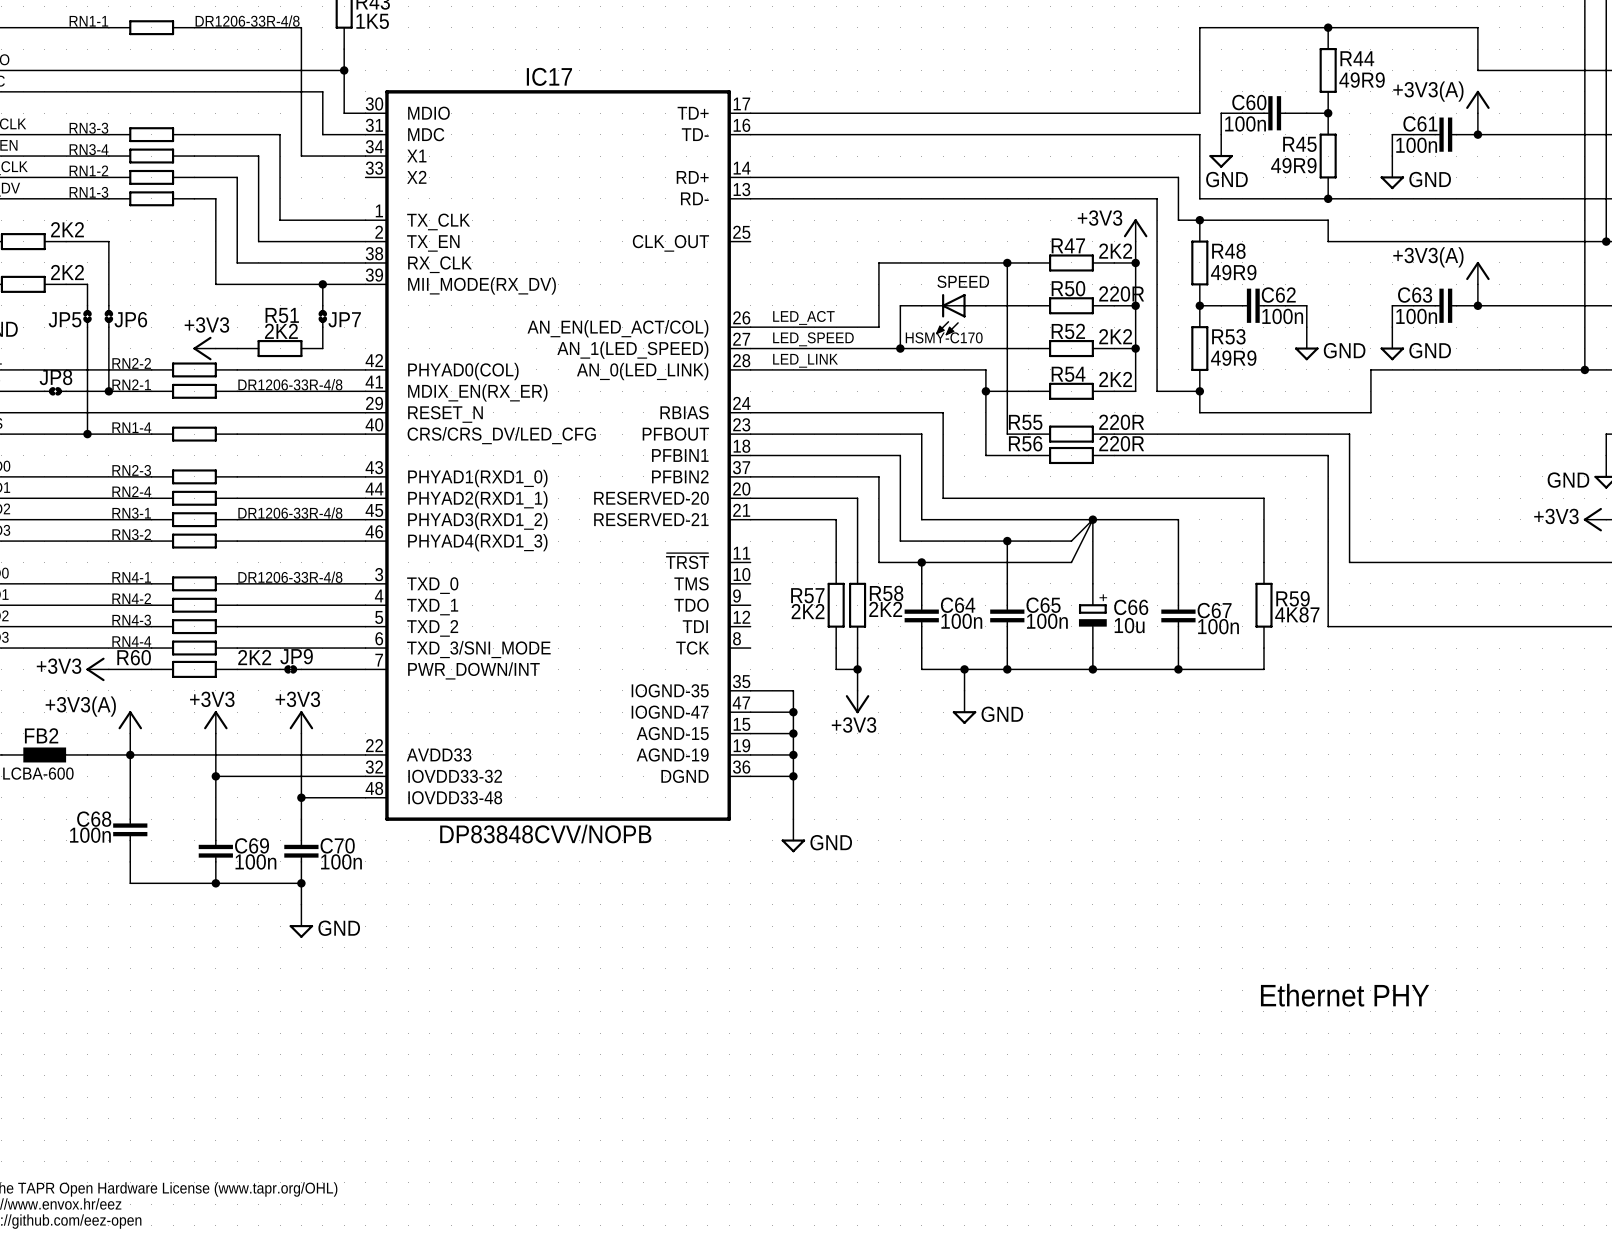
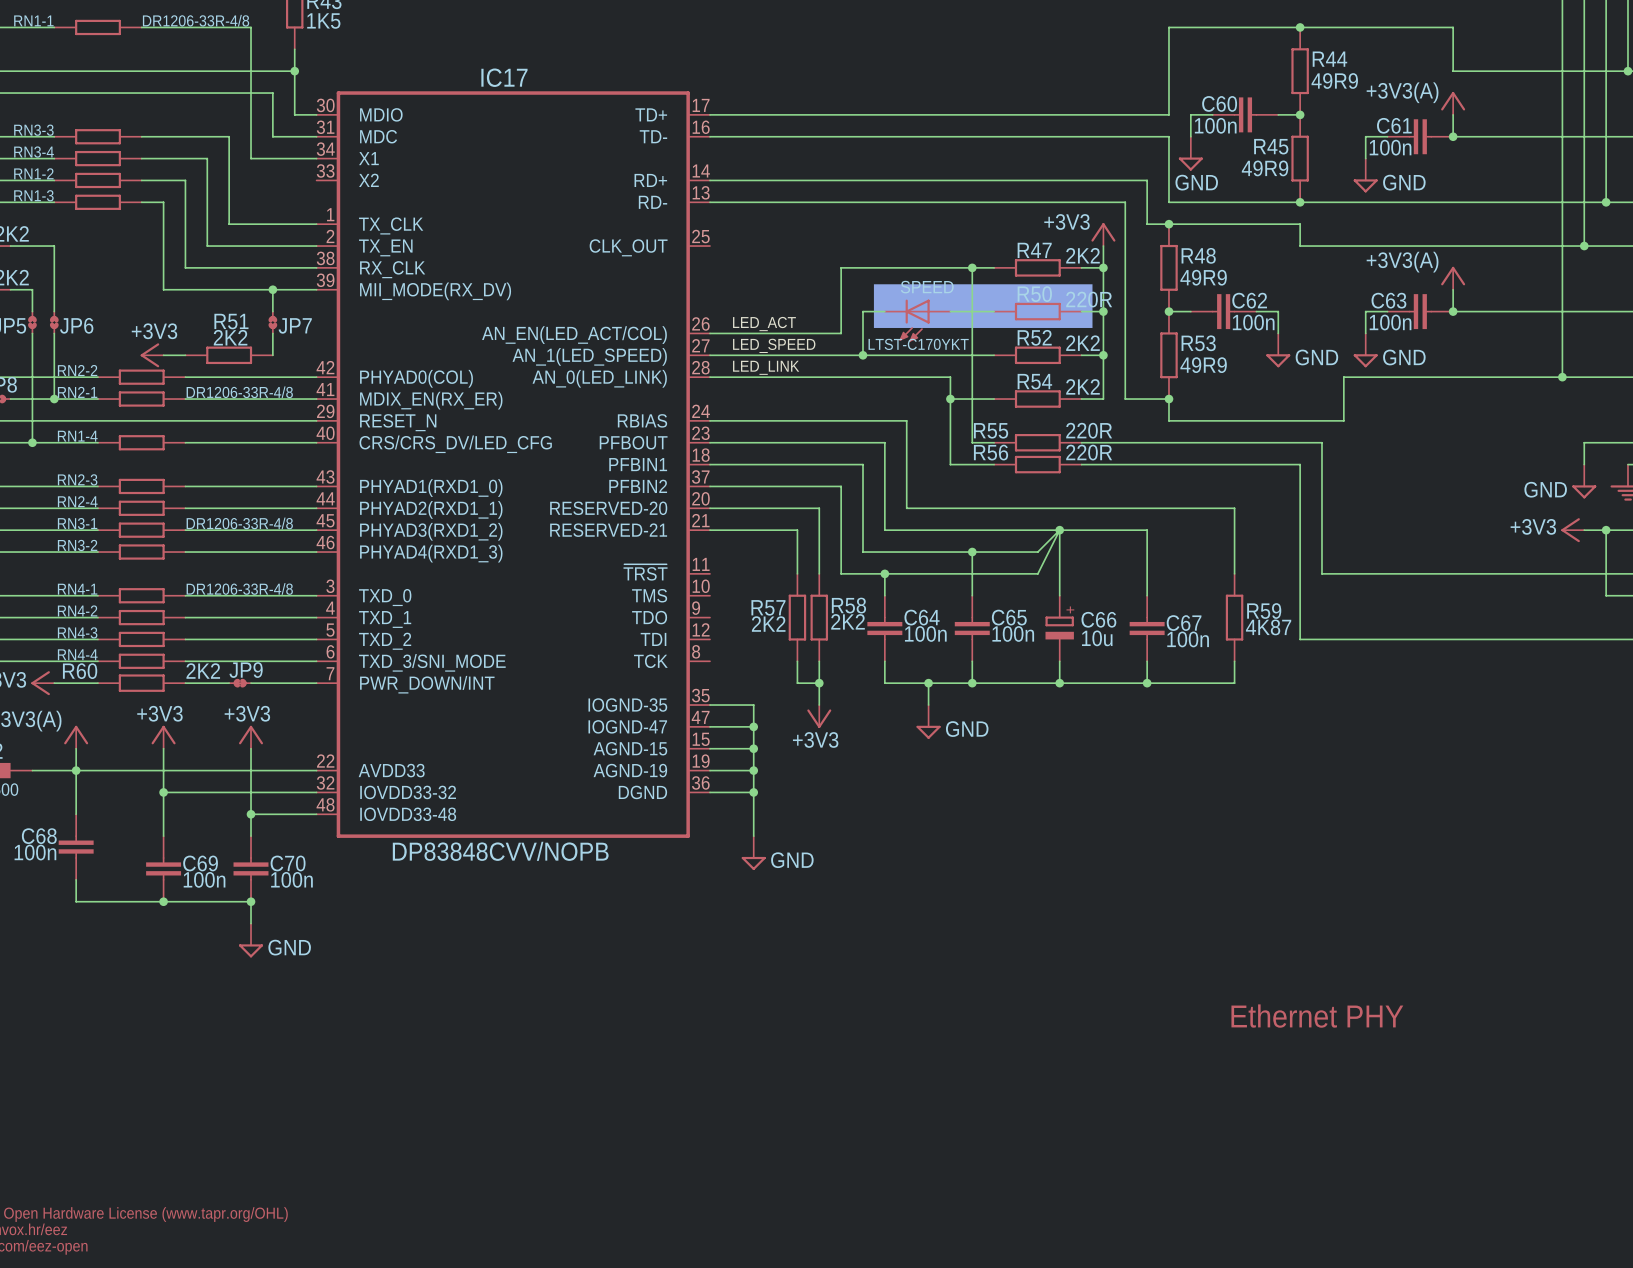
drawing: none -> [873, 284, 1093, 328]
SPEED value: HSMY-C170 (944, 337) -> LTST-C170YKT (918, 344)

